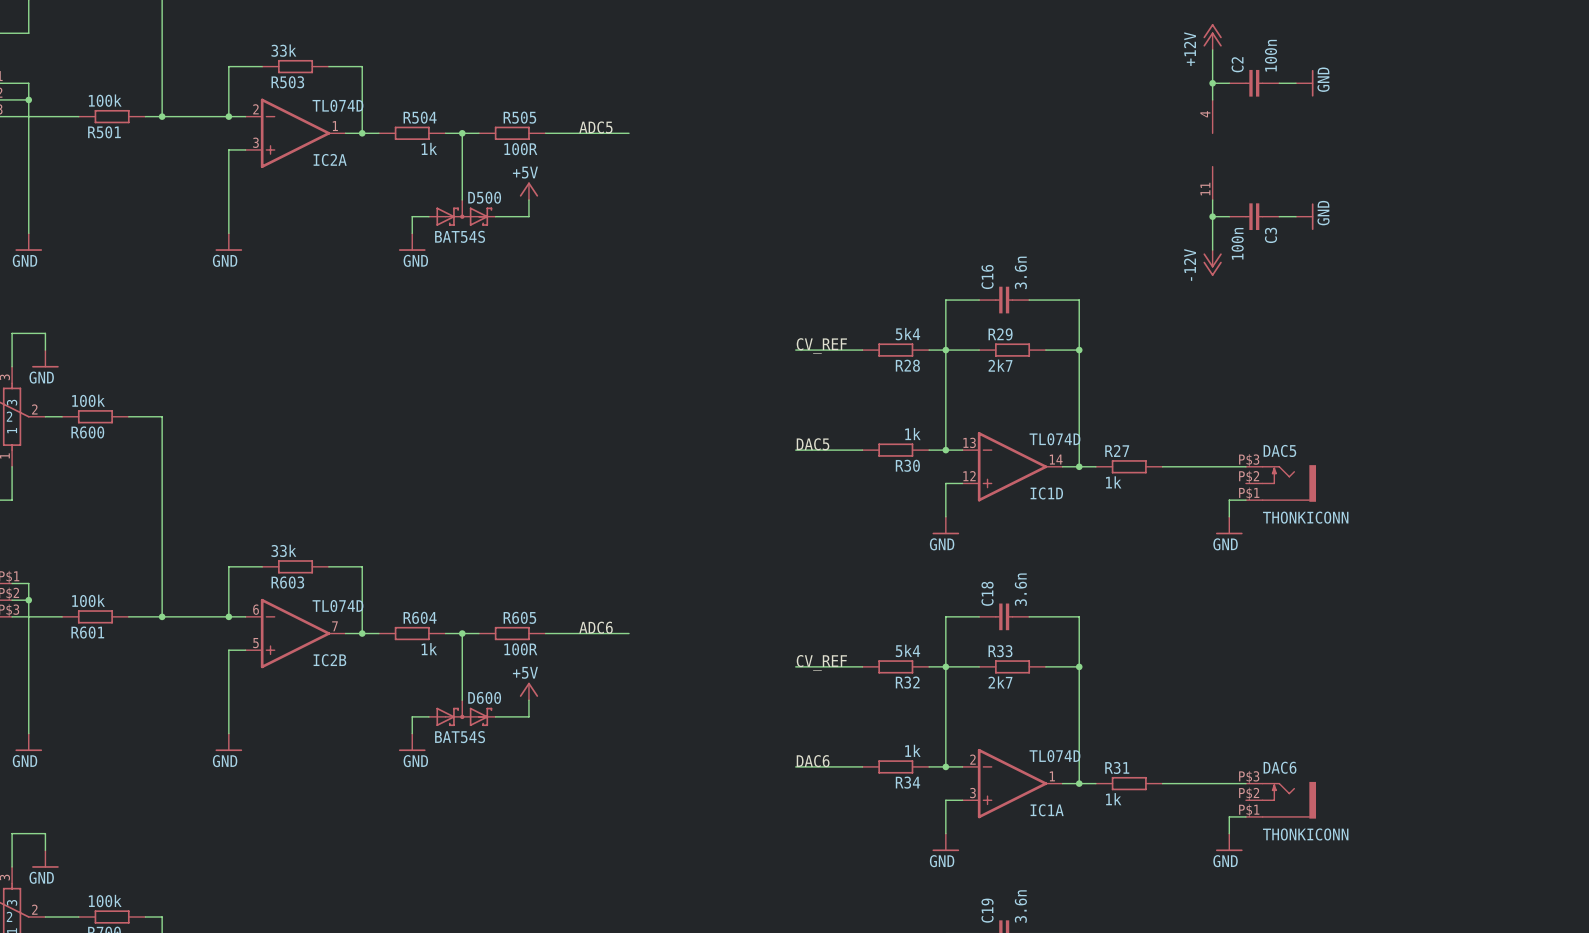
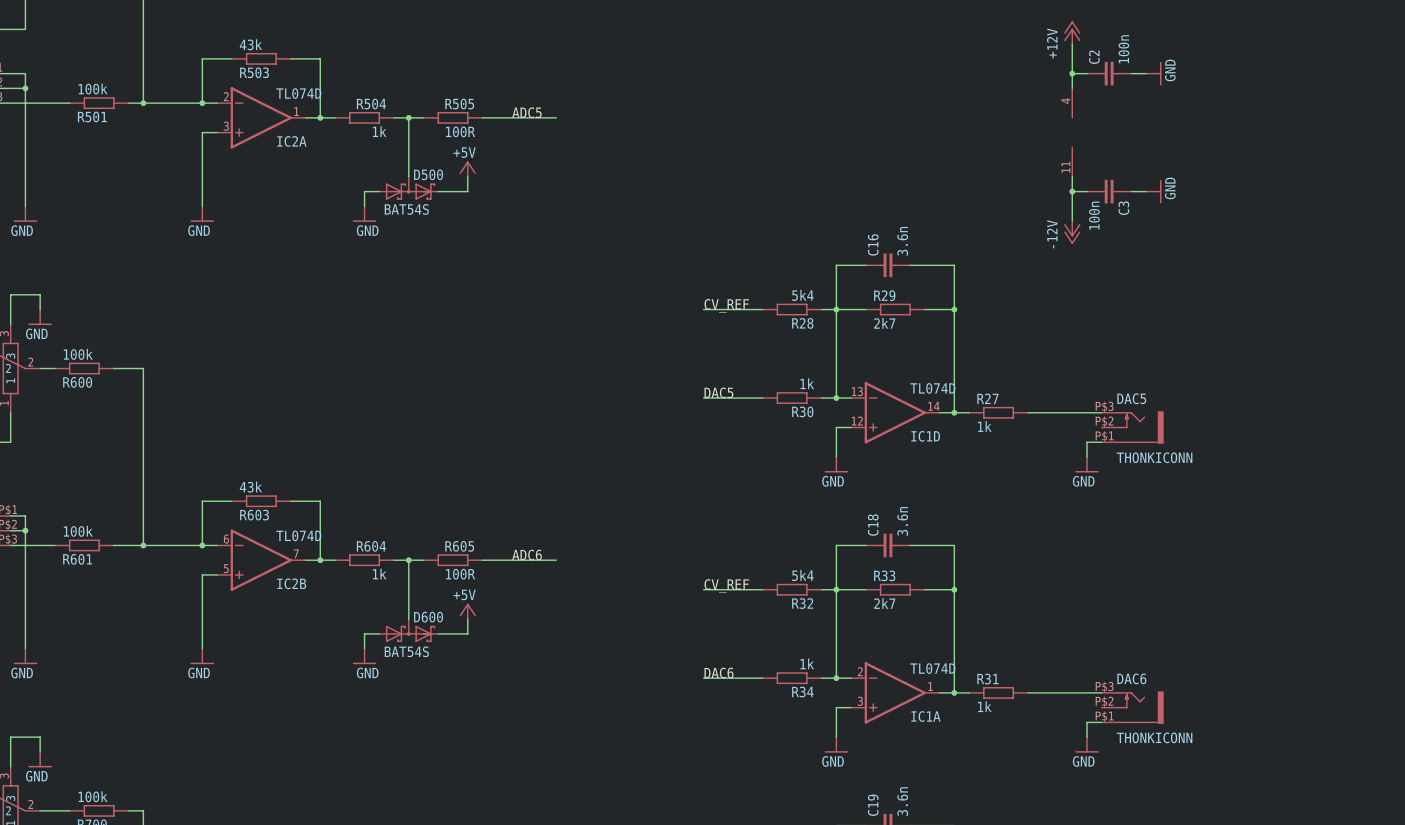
R503 value: 33k (283, 50) -> 43k (250, 44)
R603 value: 33k (283, 550) -> 43k (250, 487)

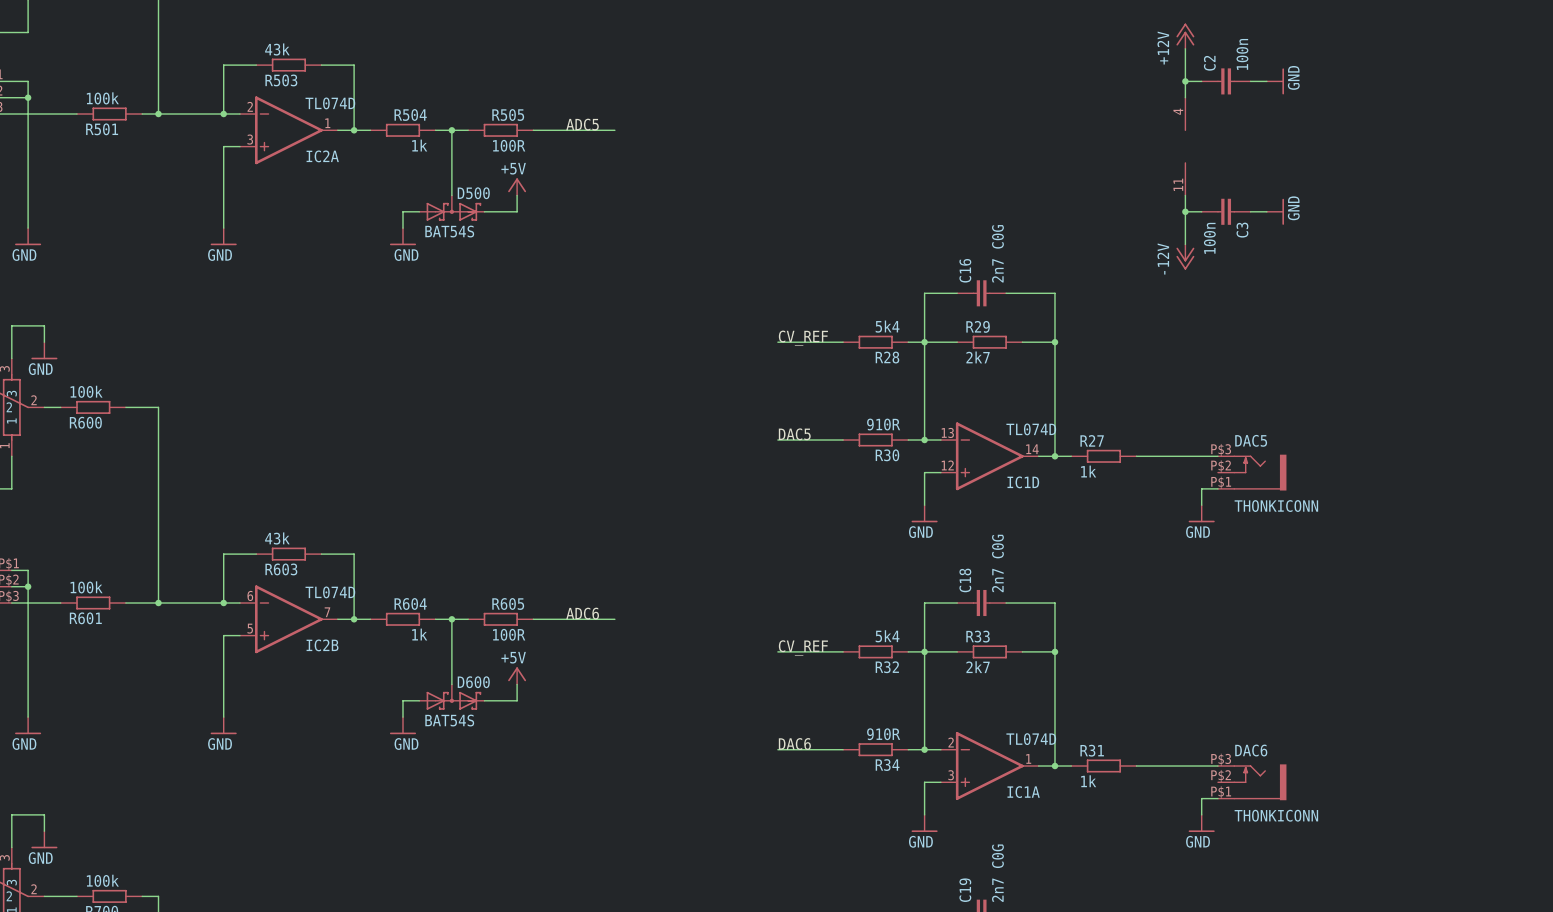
C16 value: 3.6n (902, 241) -> 2n7 C0G (997, 253)
R30 value: 1k (807, 383) -> 910R (883, 424)
C18 value: 3.6n (902, 521) -> 2n7 C0G (997, 563)
R34 value: 1k (807, 663) -> 910R (883, 734)
C19 value: 3.6n (902, 801) -> 2n7 C0G (997, 873)

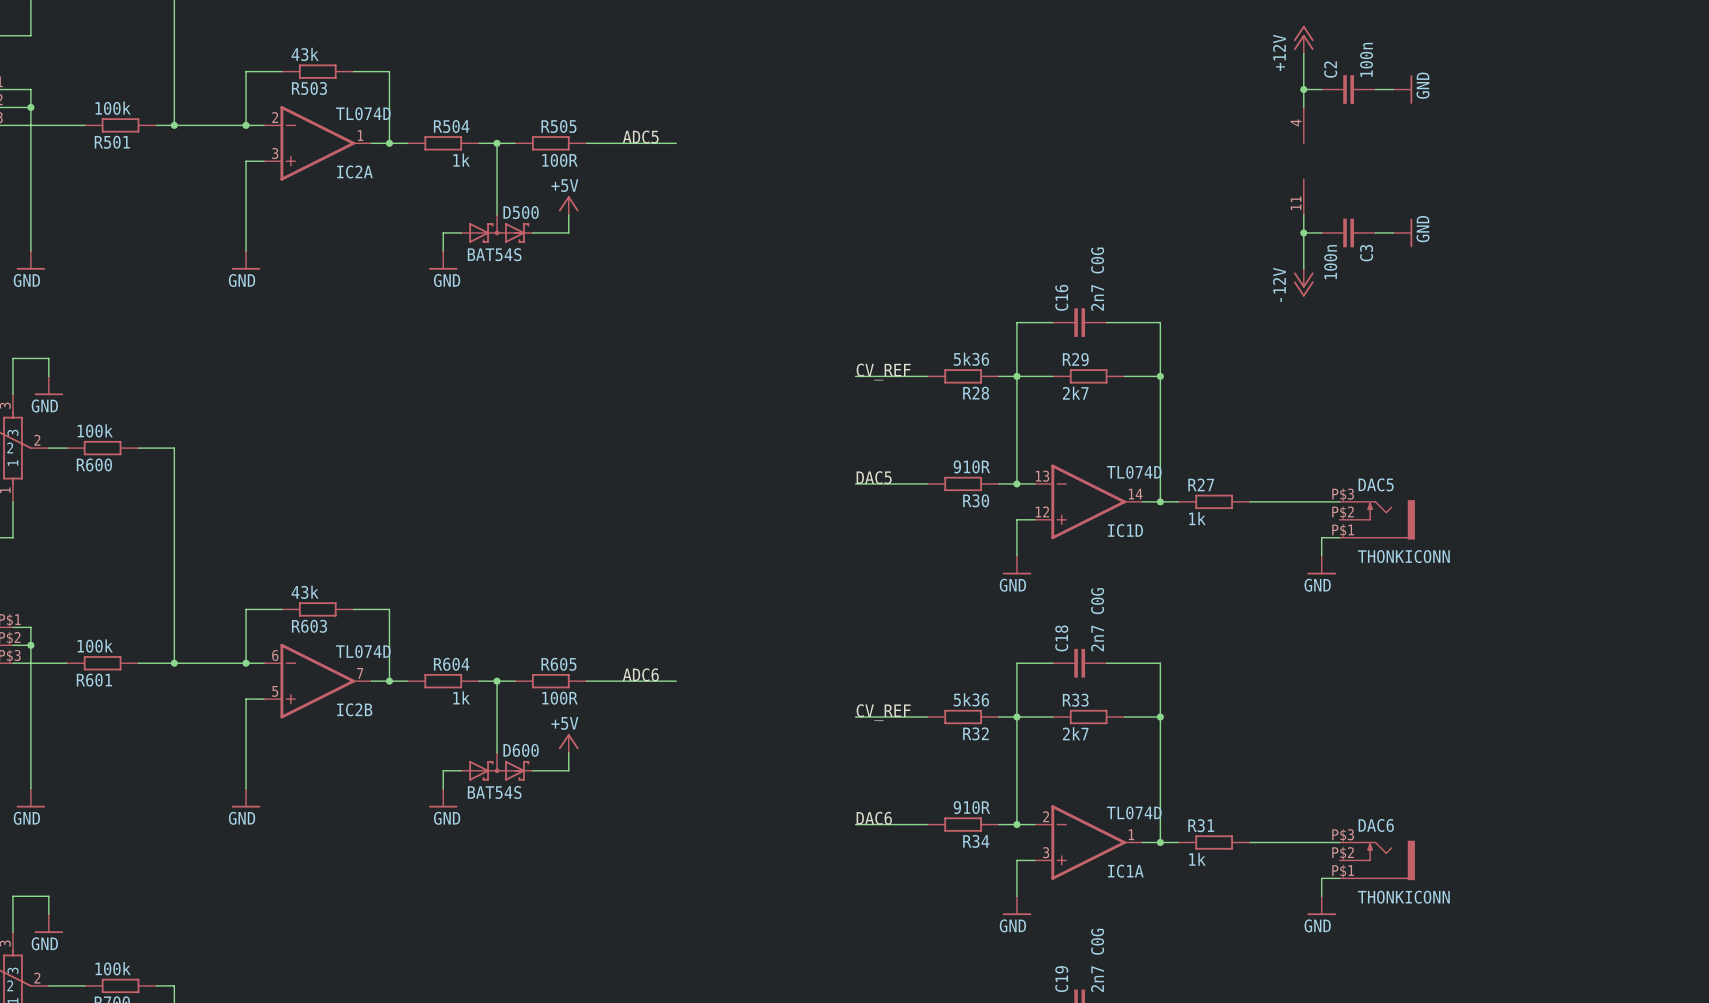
R28 value: 5k4 (887, 326) -> 5k36 (971, 359)
R32 value: 5k4 (887, 636) -> 5k36 (971, 699)

